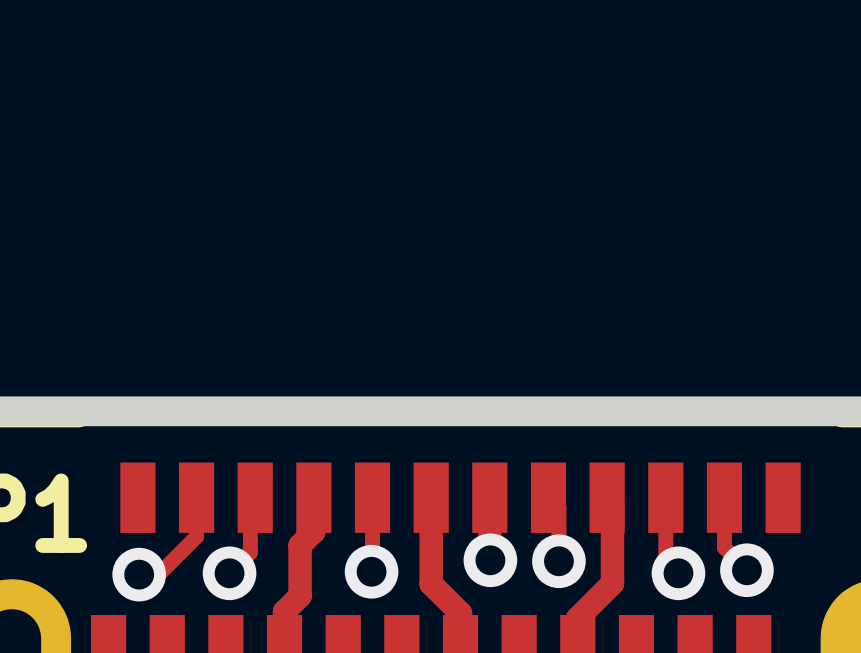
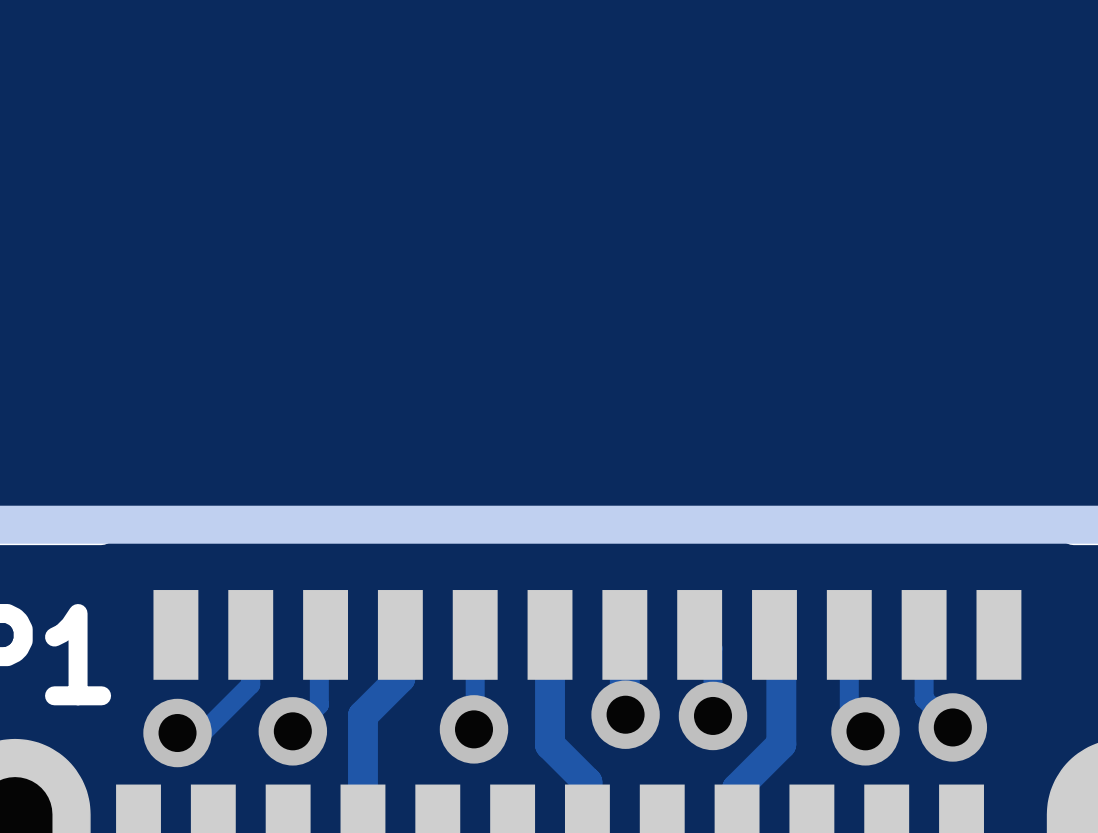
track: (300, 545) (300, 596) (284, 611) -> (382, 695) (362, 715) (362, 780)

